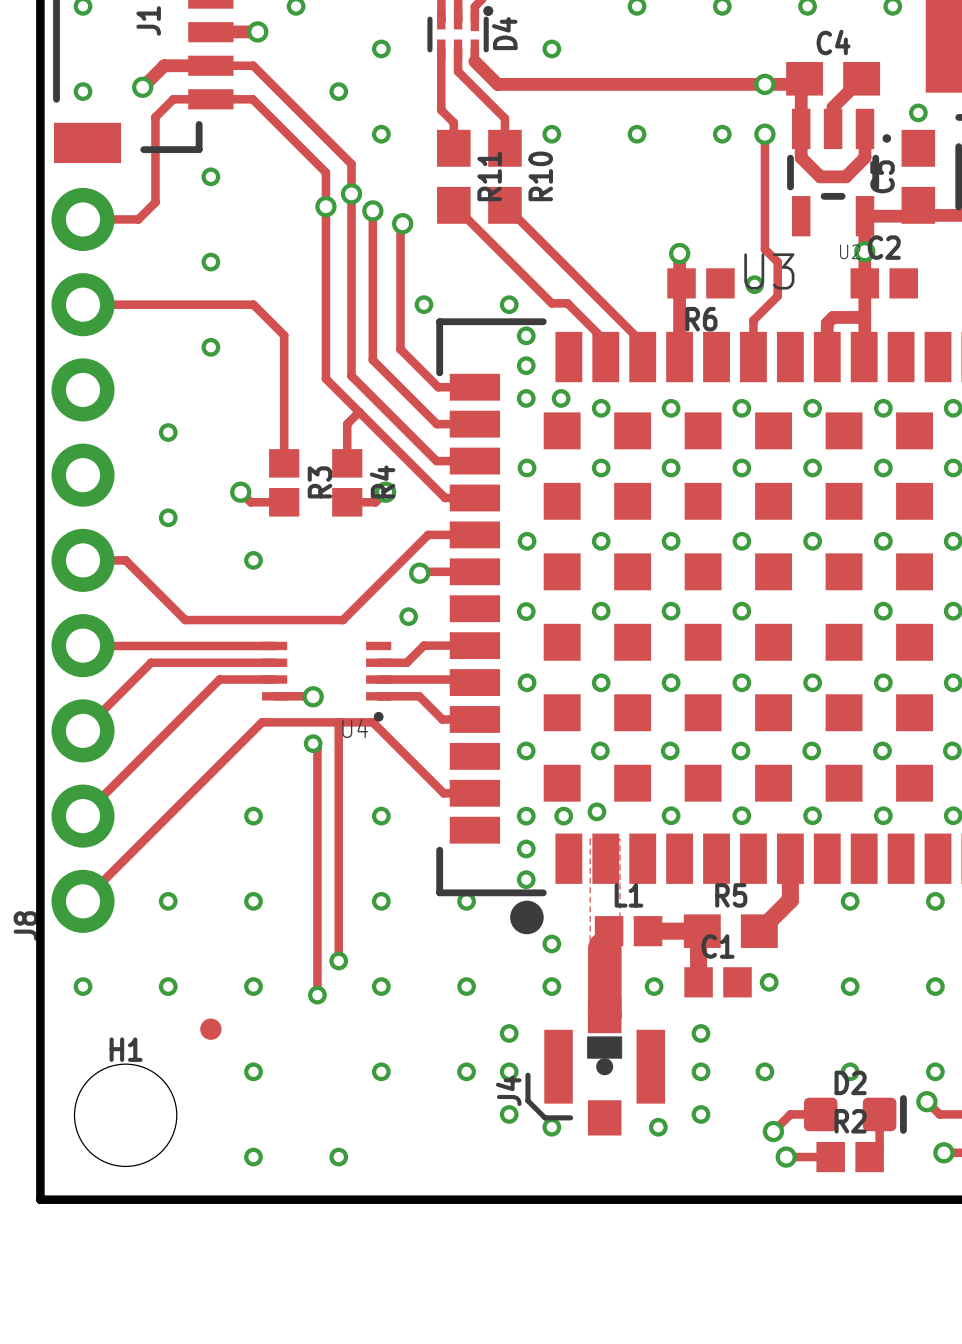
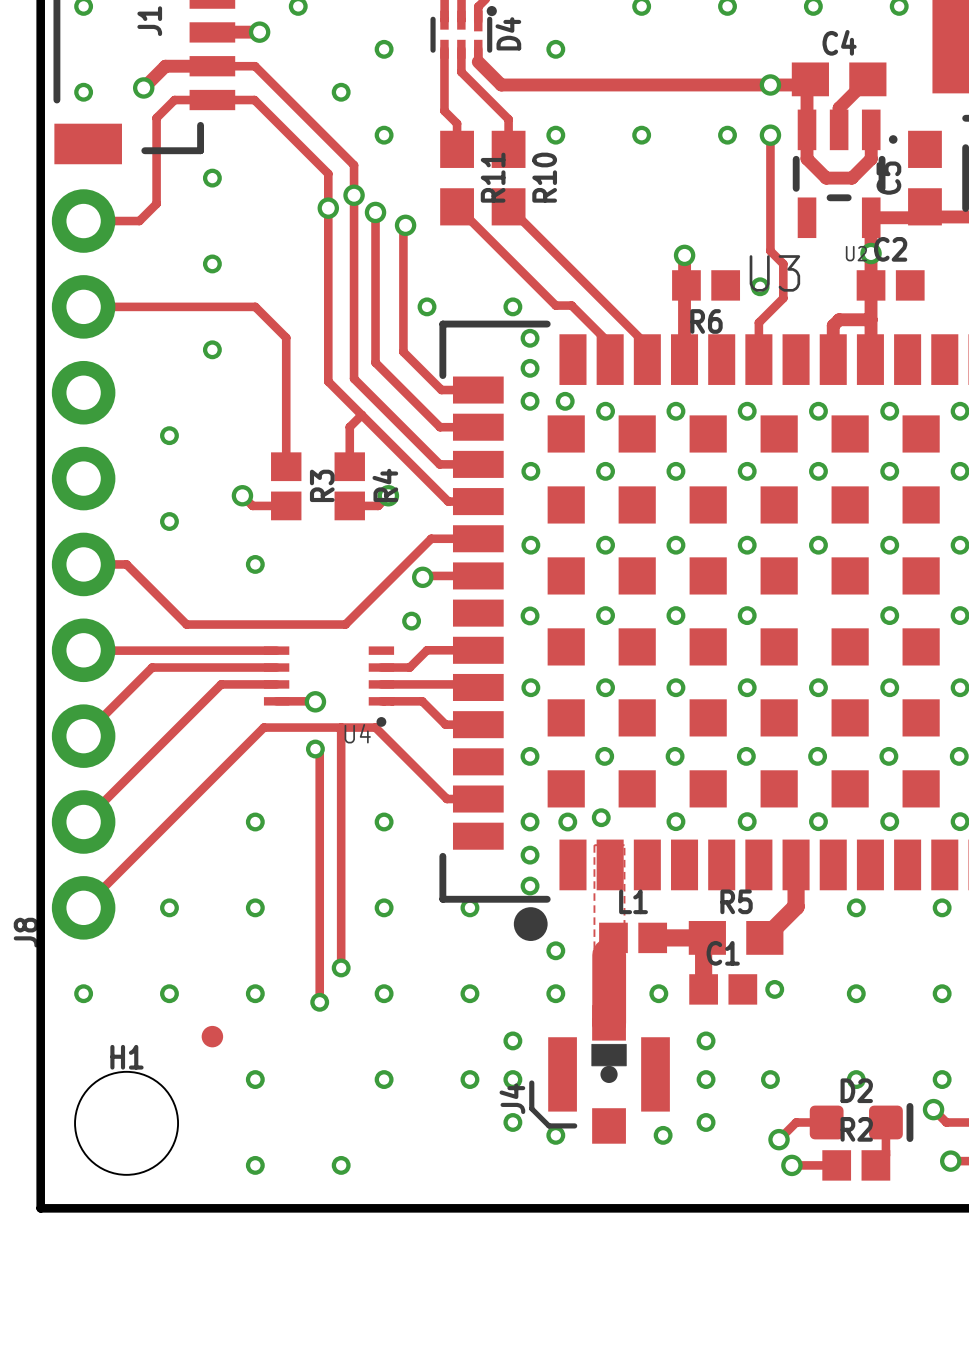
via: (918, 112) -> none

